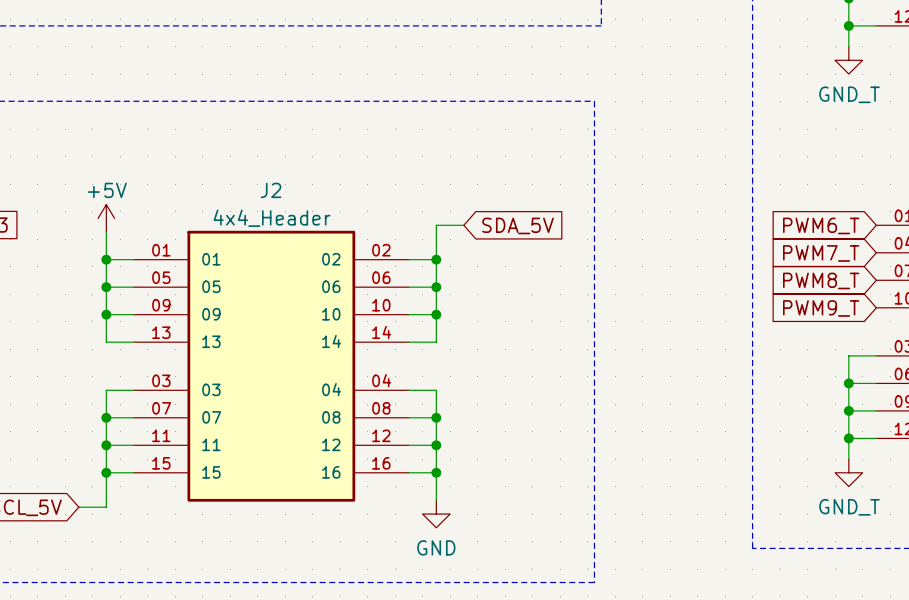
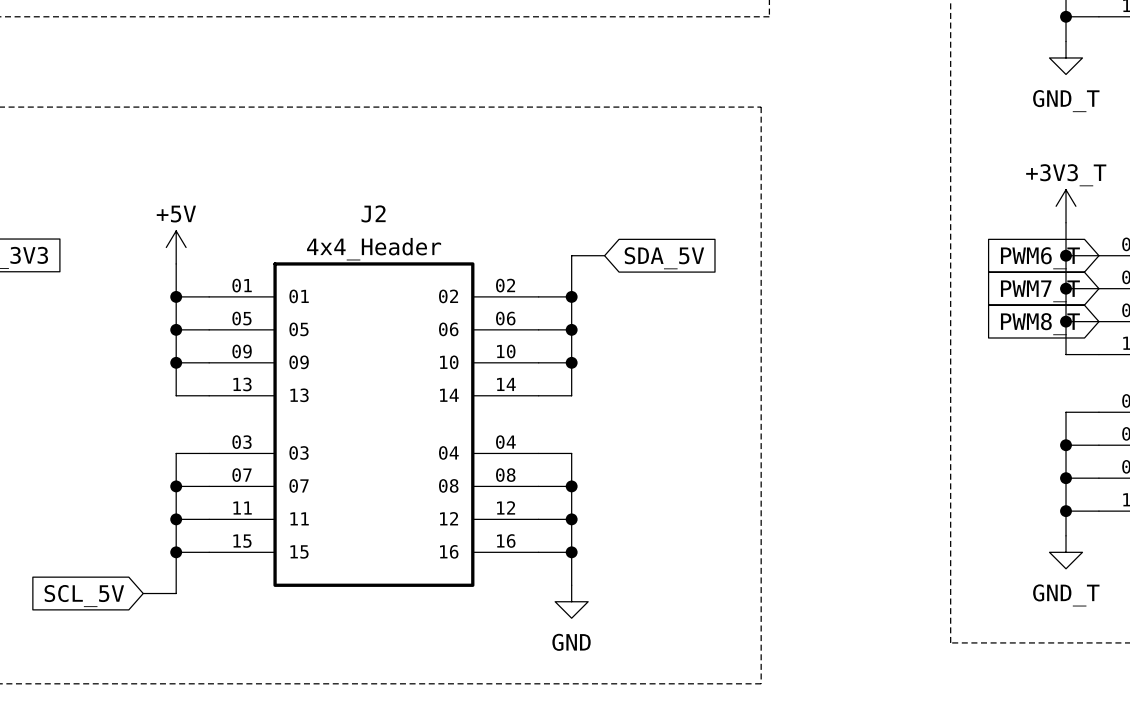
power symbol: none -> +3V3_T (1066, 206)
wire: none -> (1066, 222) (1066, 354) (1098, 354)
wire: none -> (1066, 255) (1098, 255)
junction: none -> (1066, 255)
wire: none -> (1066, 288) (1098, 288)
junction: none -> (1066, 288)
wire: none -> (1066, 321) (1098, 321)
junction: none -> (1066, 321)
global label: PWM9_T (821, 308) -> none

